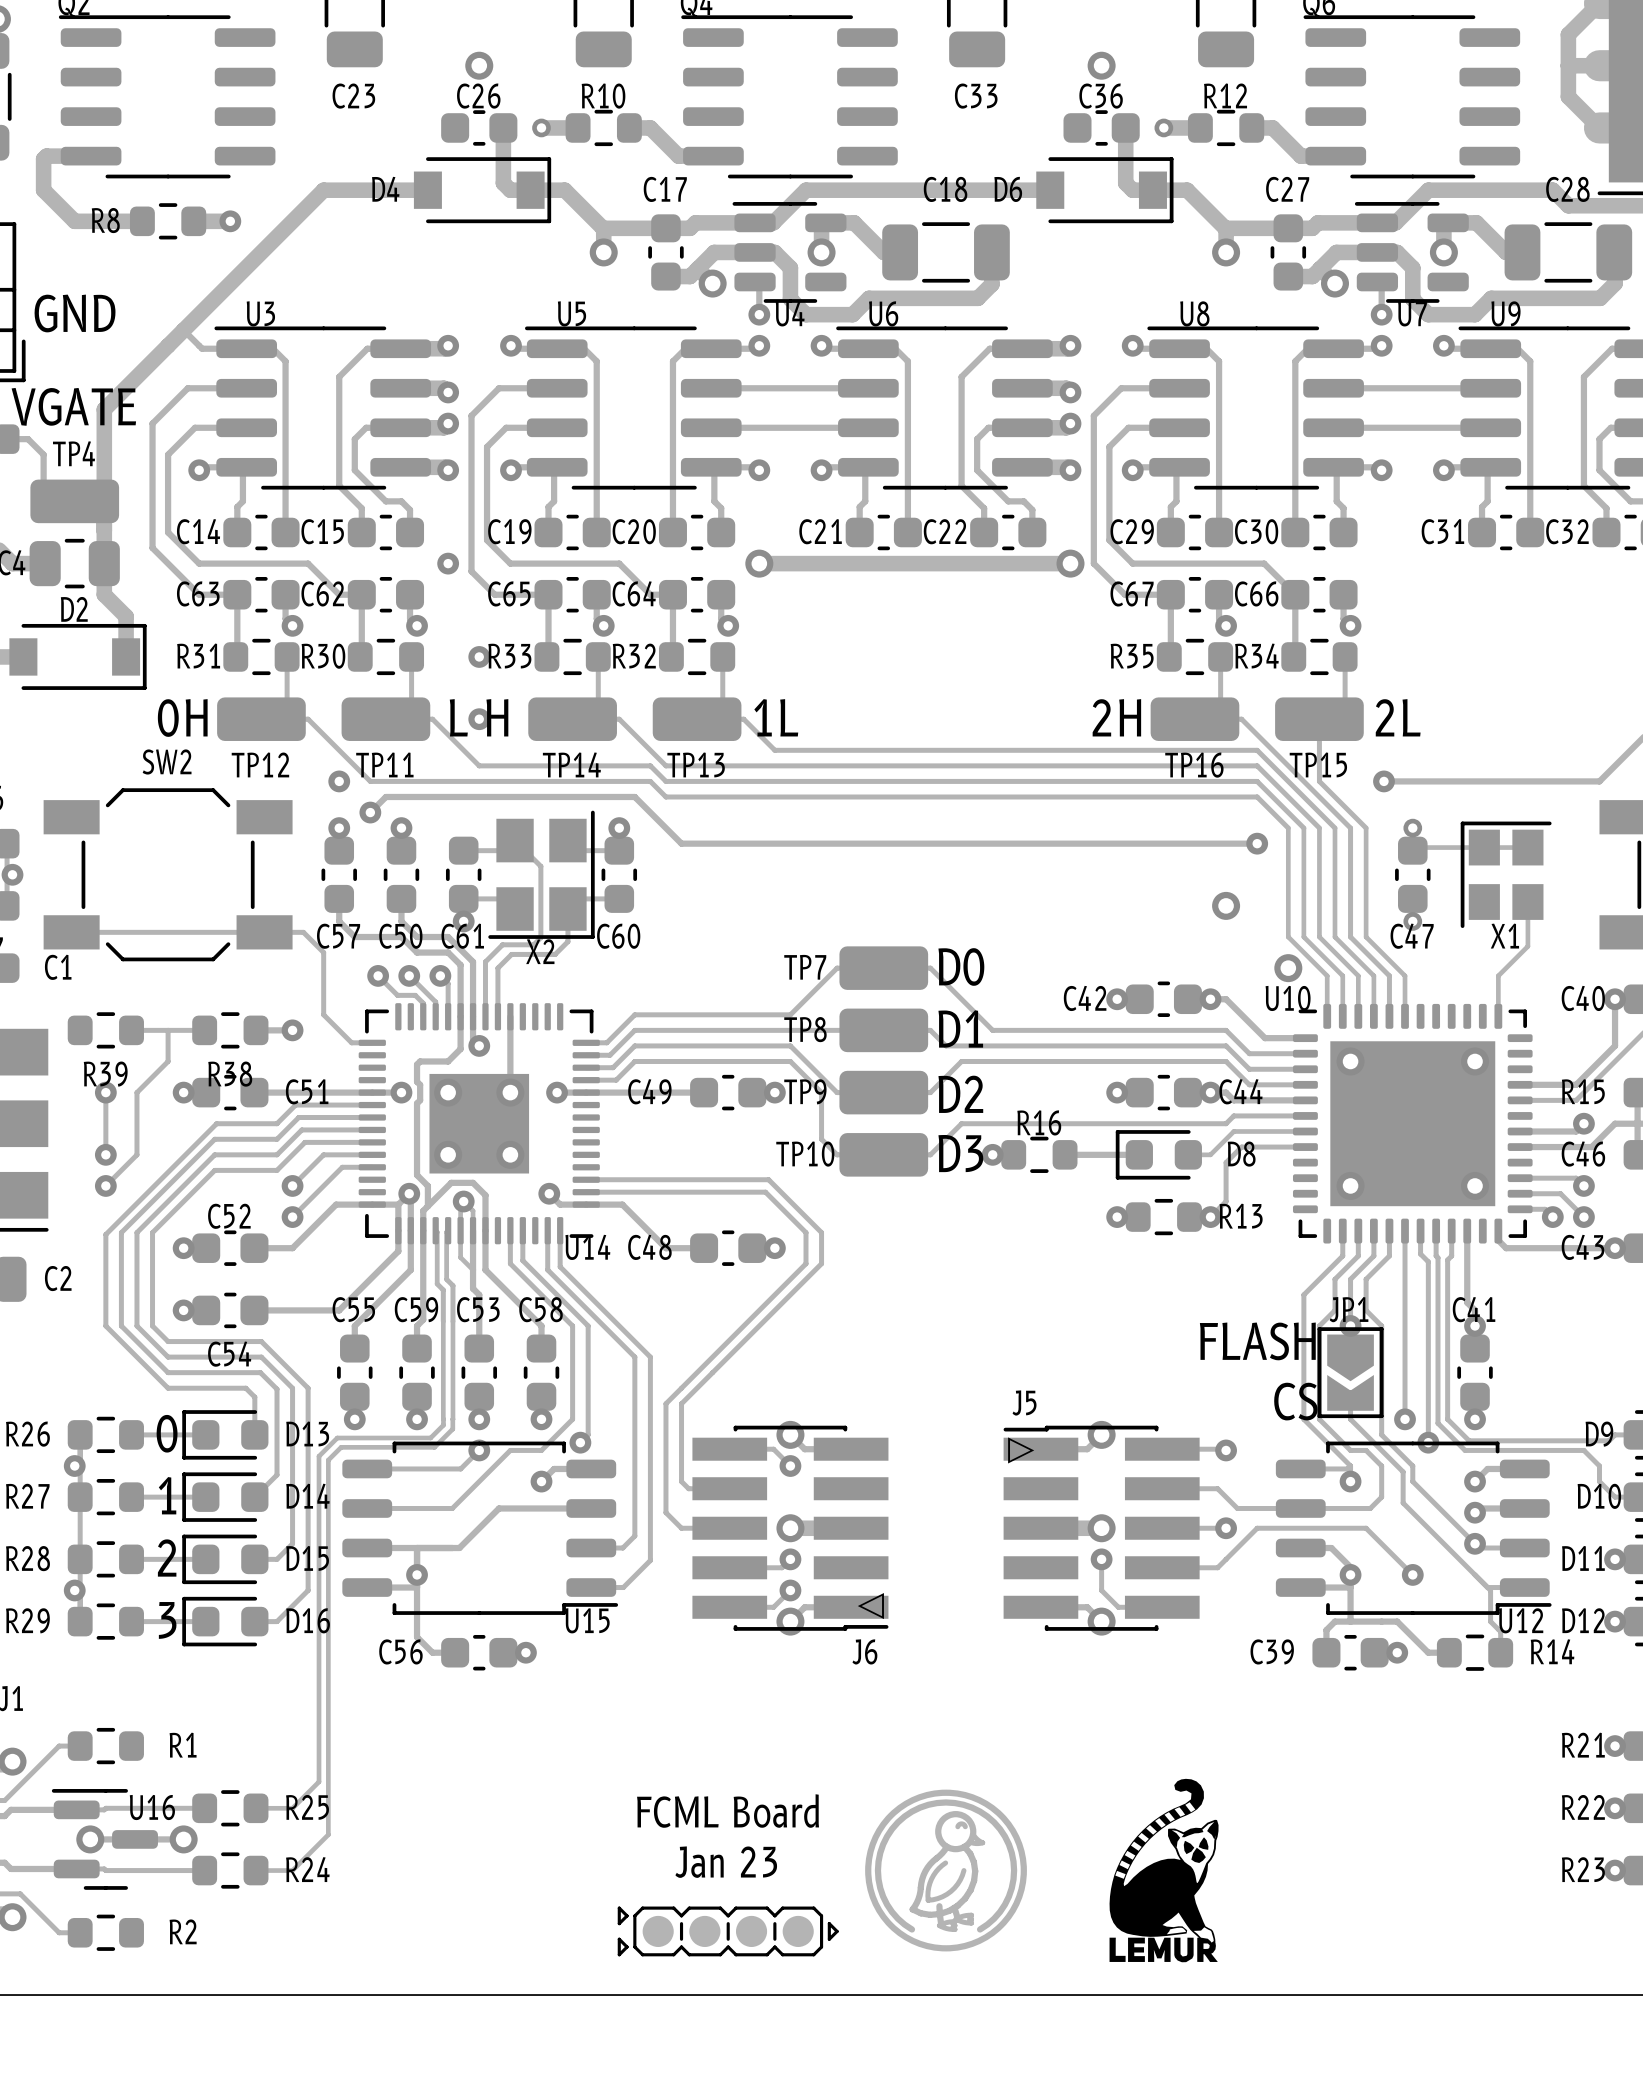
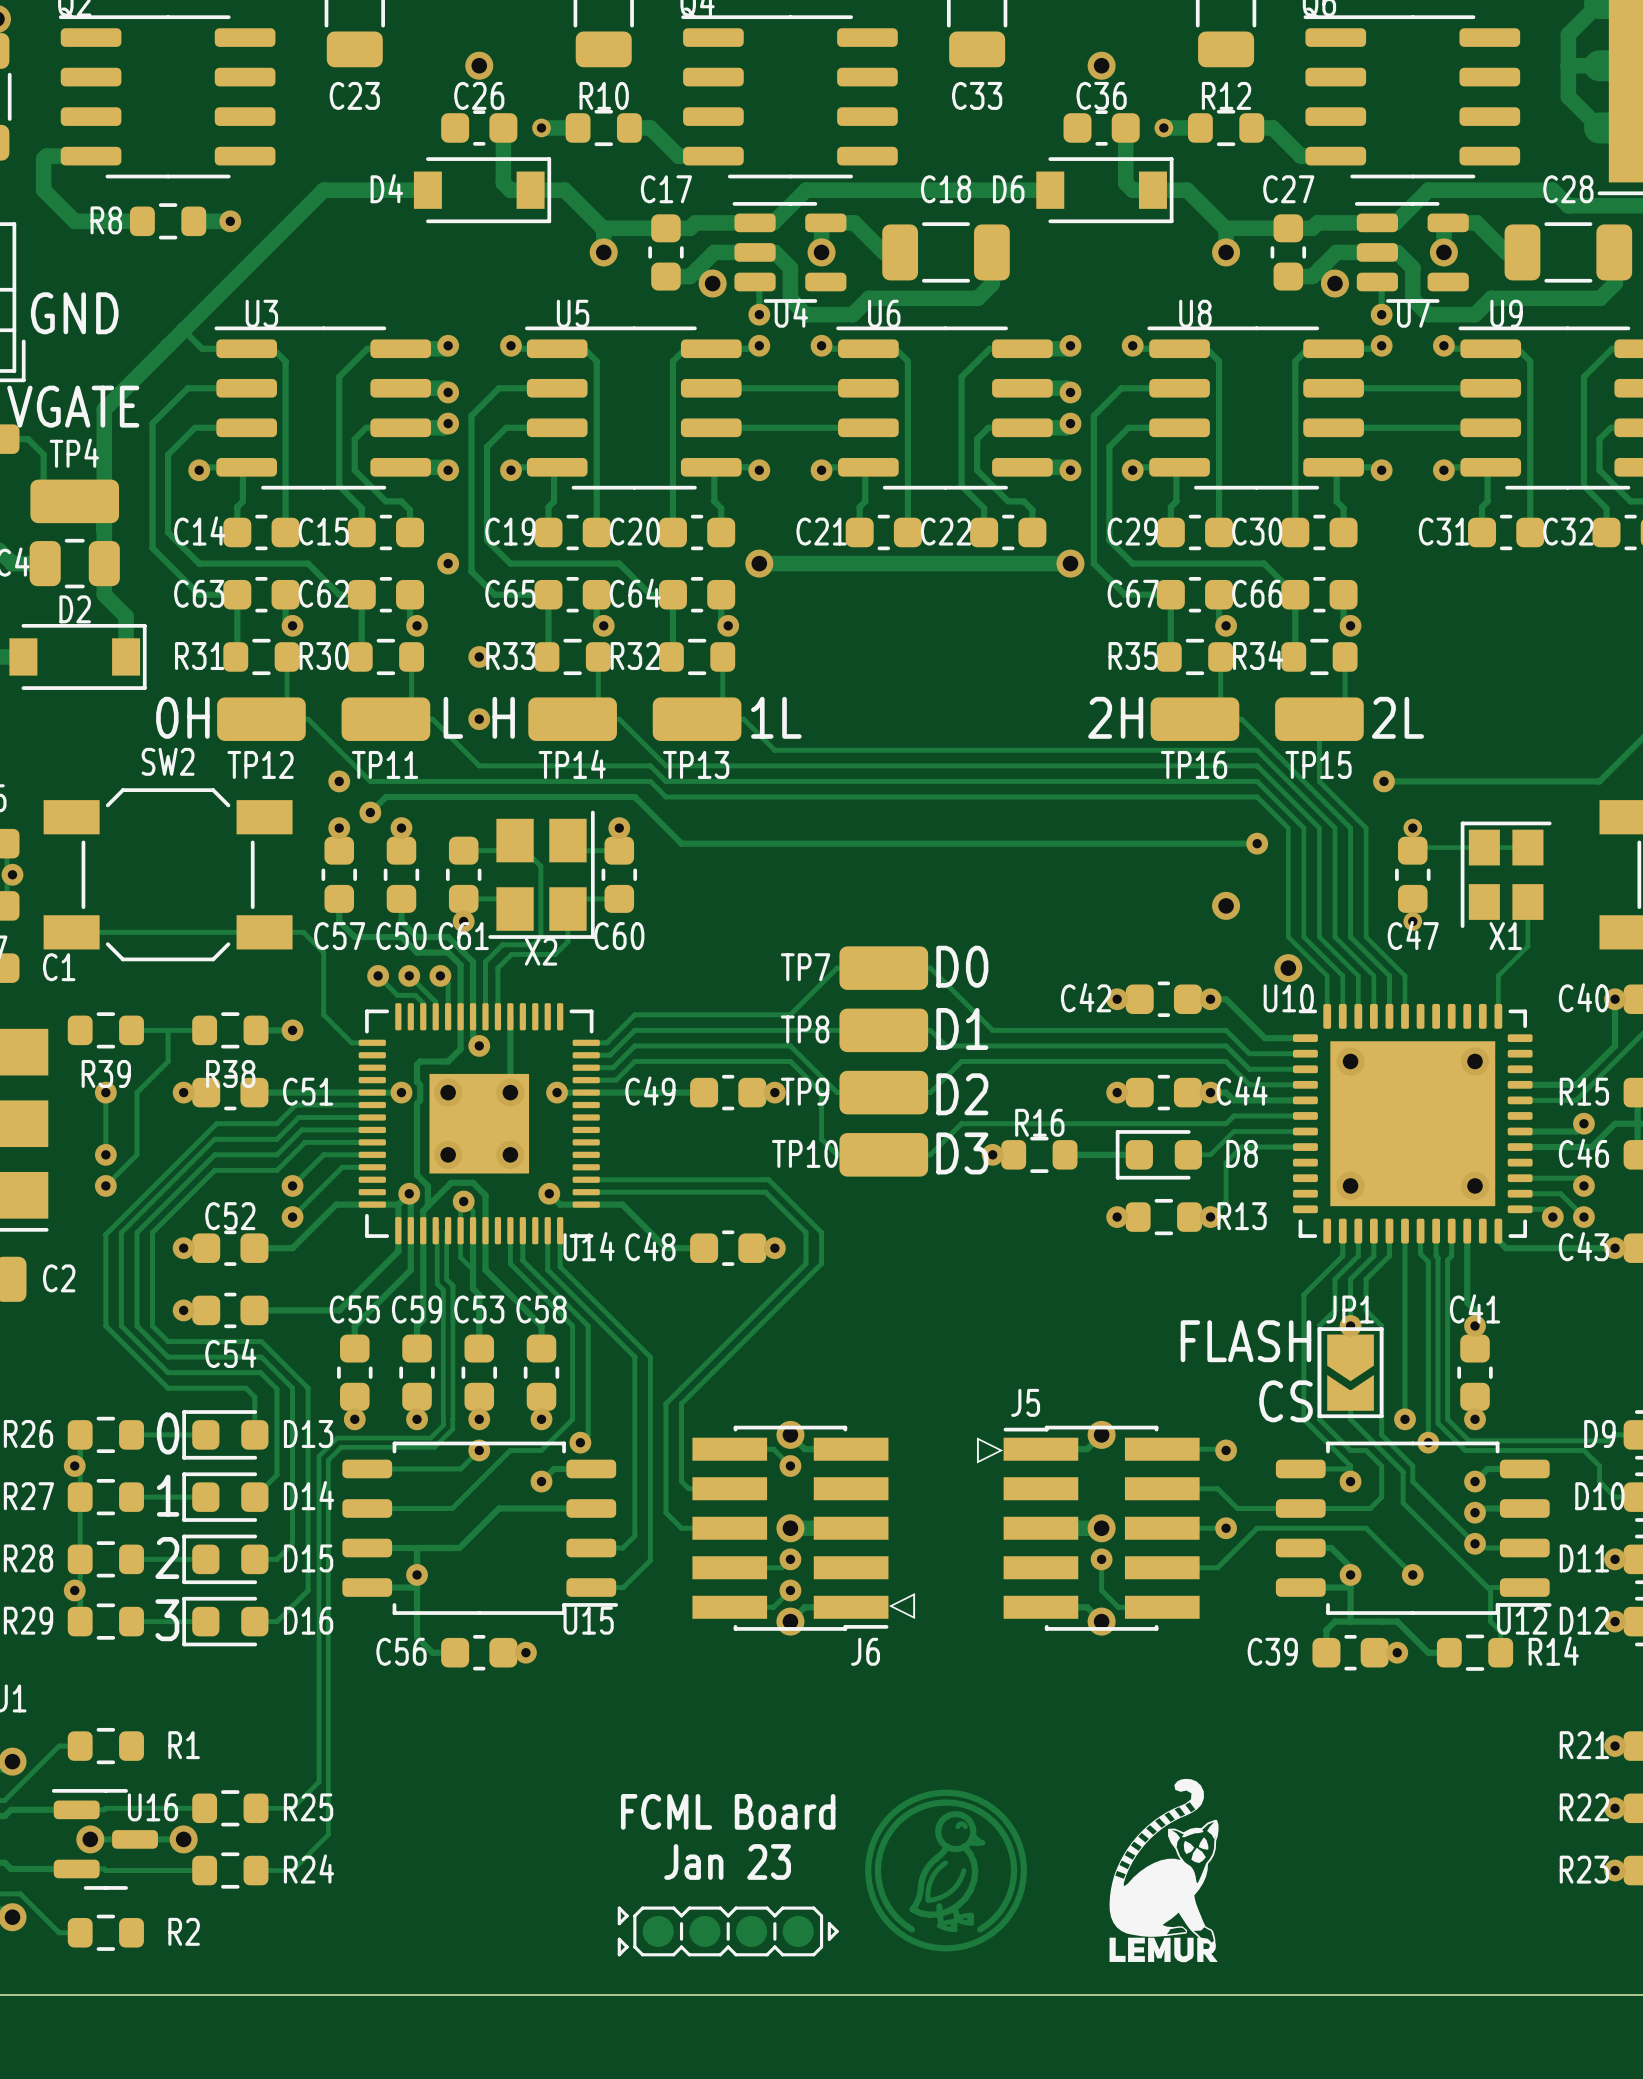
text position: △ (1021, 1450) -> △ (990, 1450)
text position: △ (870, 1606) -> △ (902, 1606)

